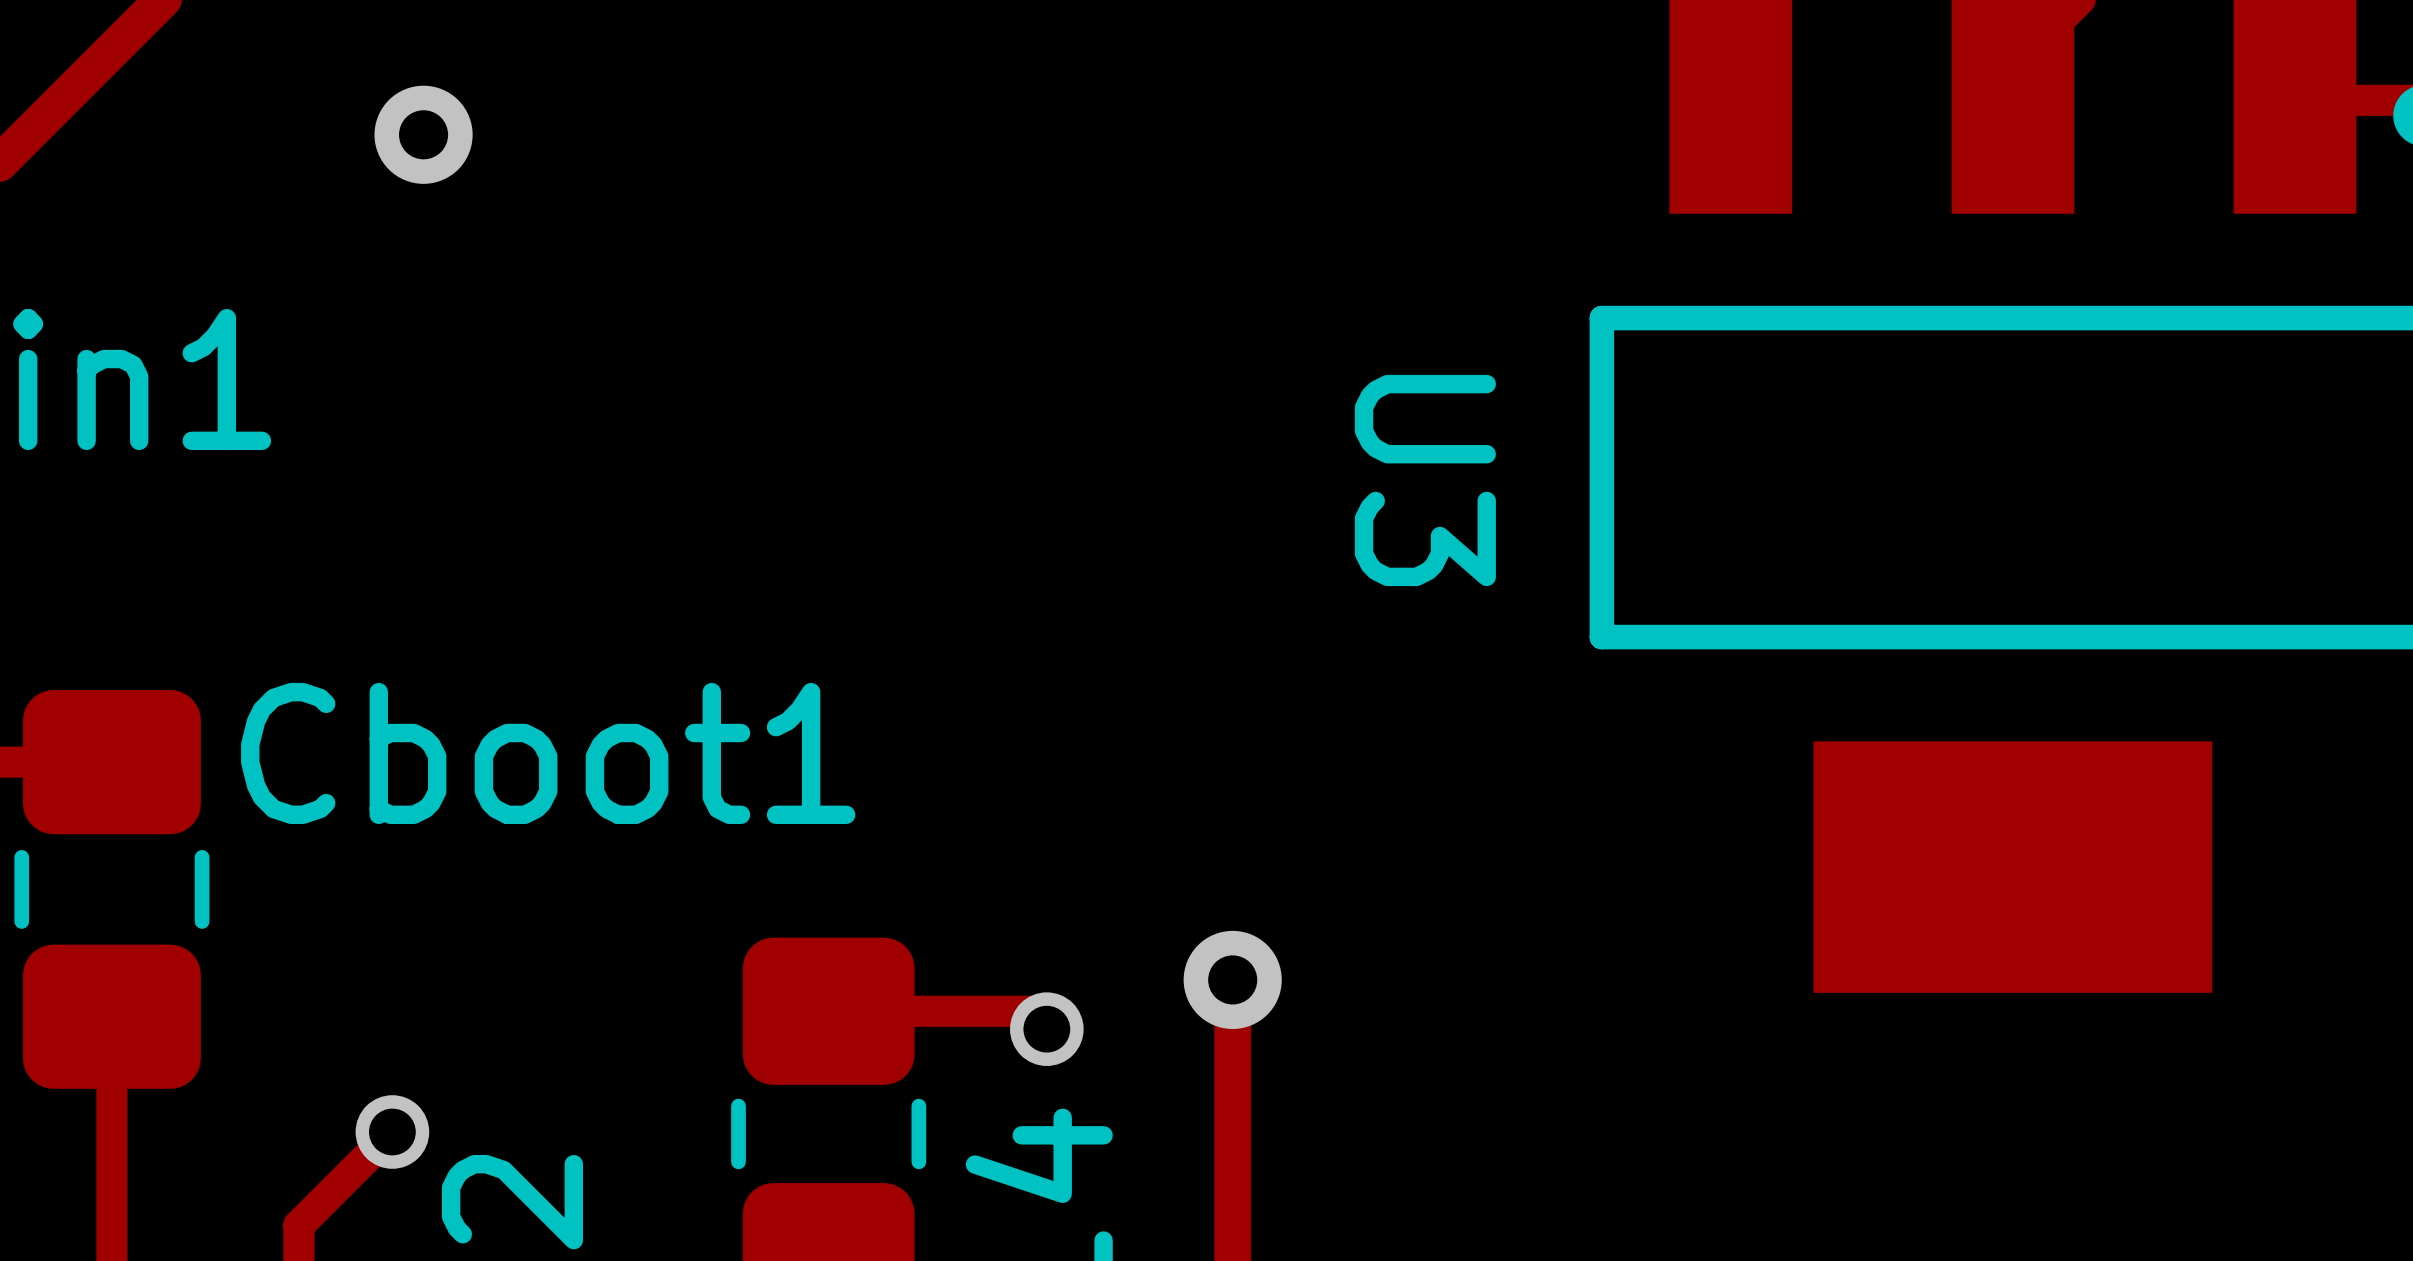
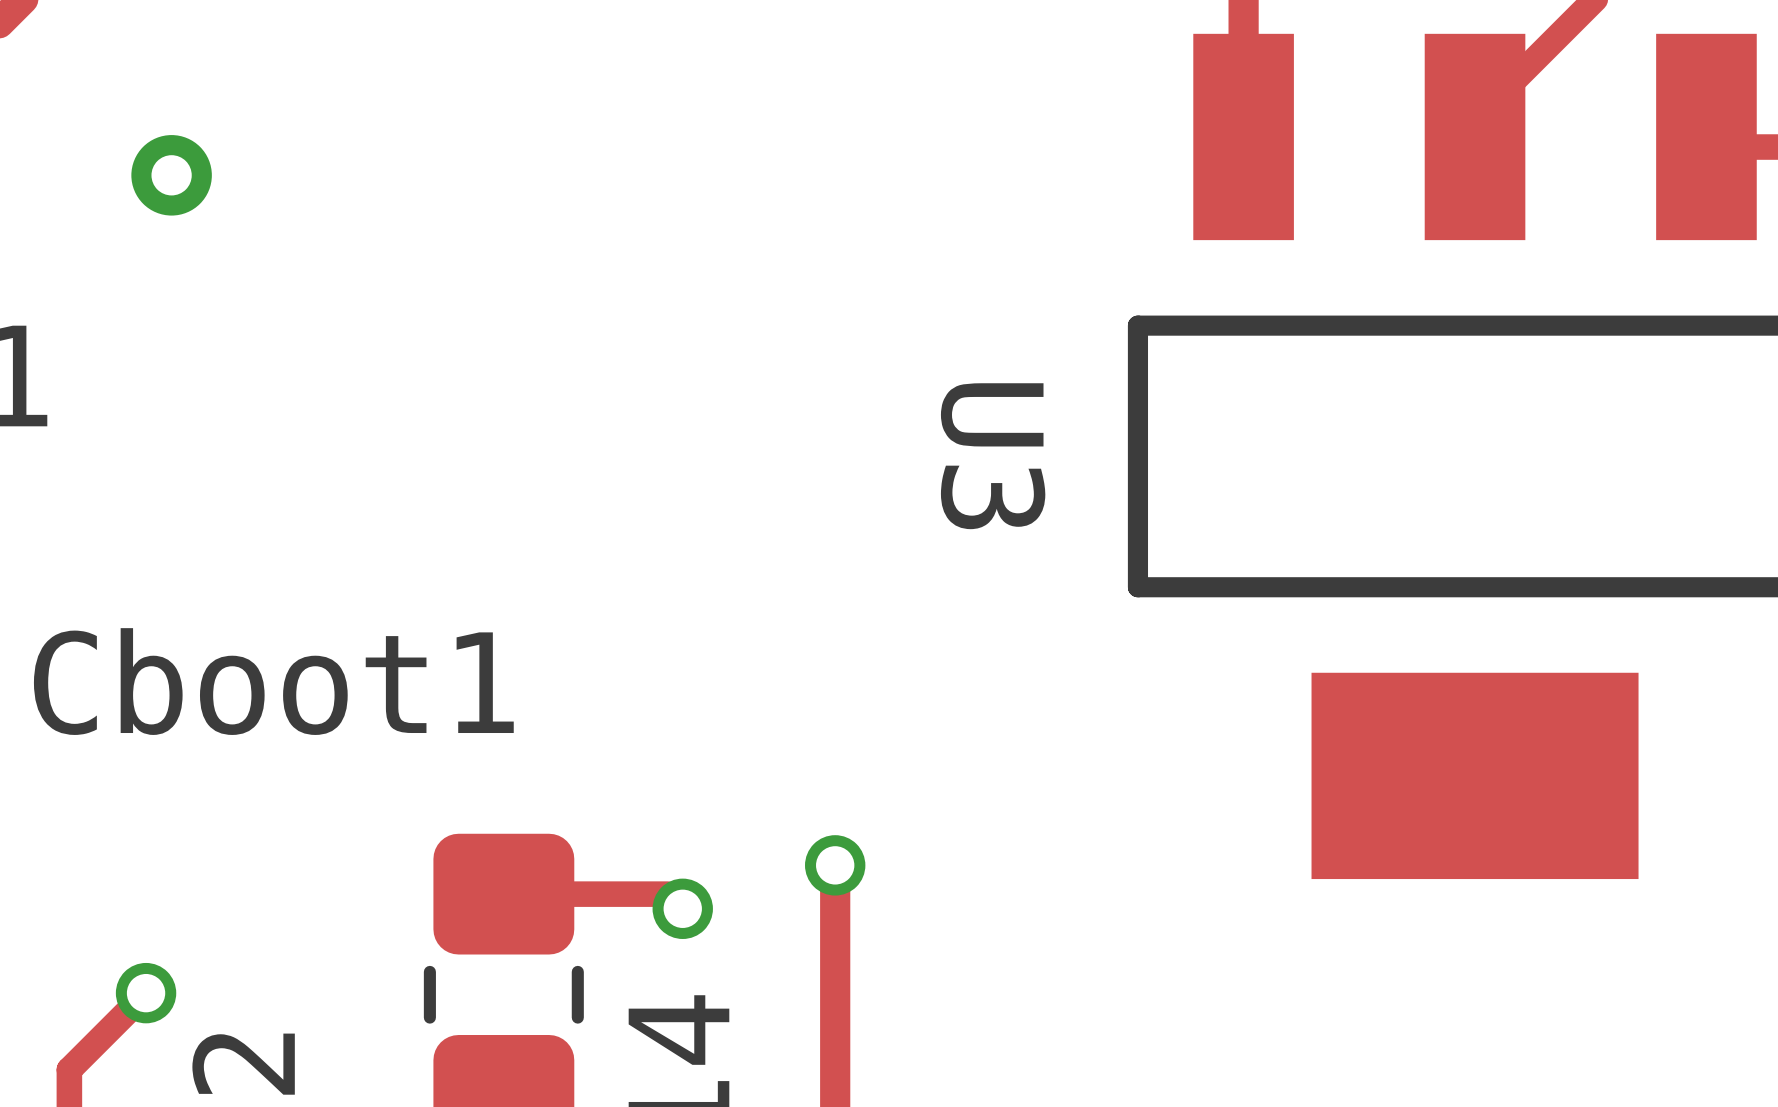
via size: [1183, 930, 1282, 1030] -> [805, 835, 866, 896]

